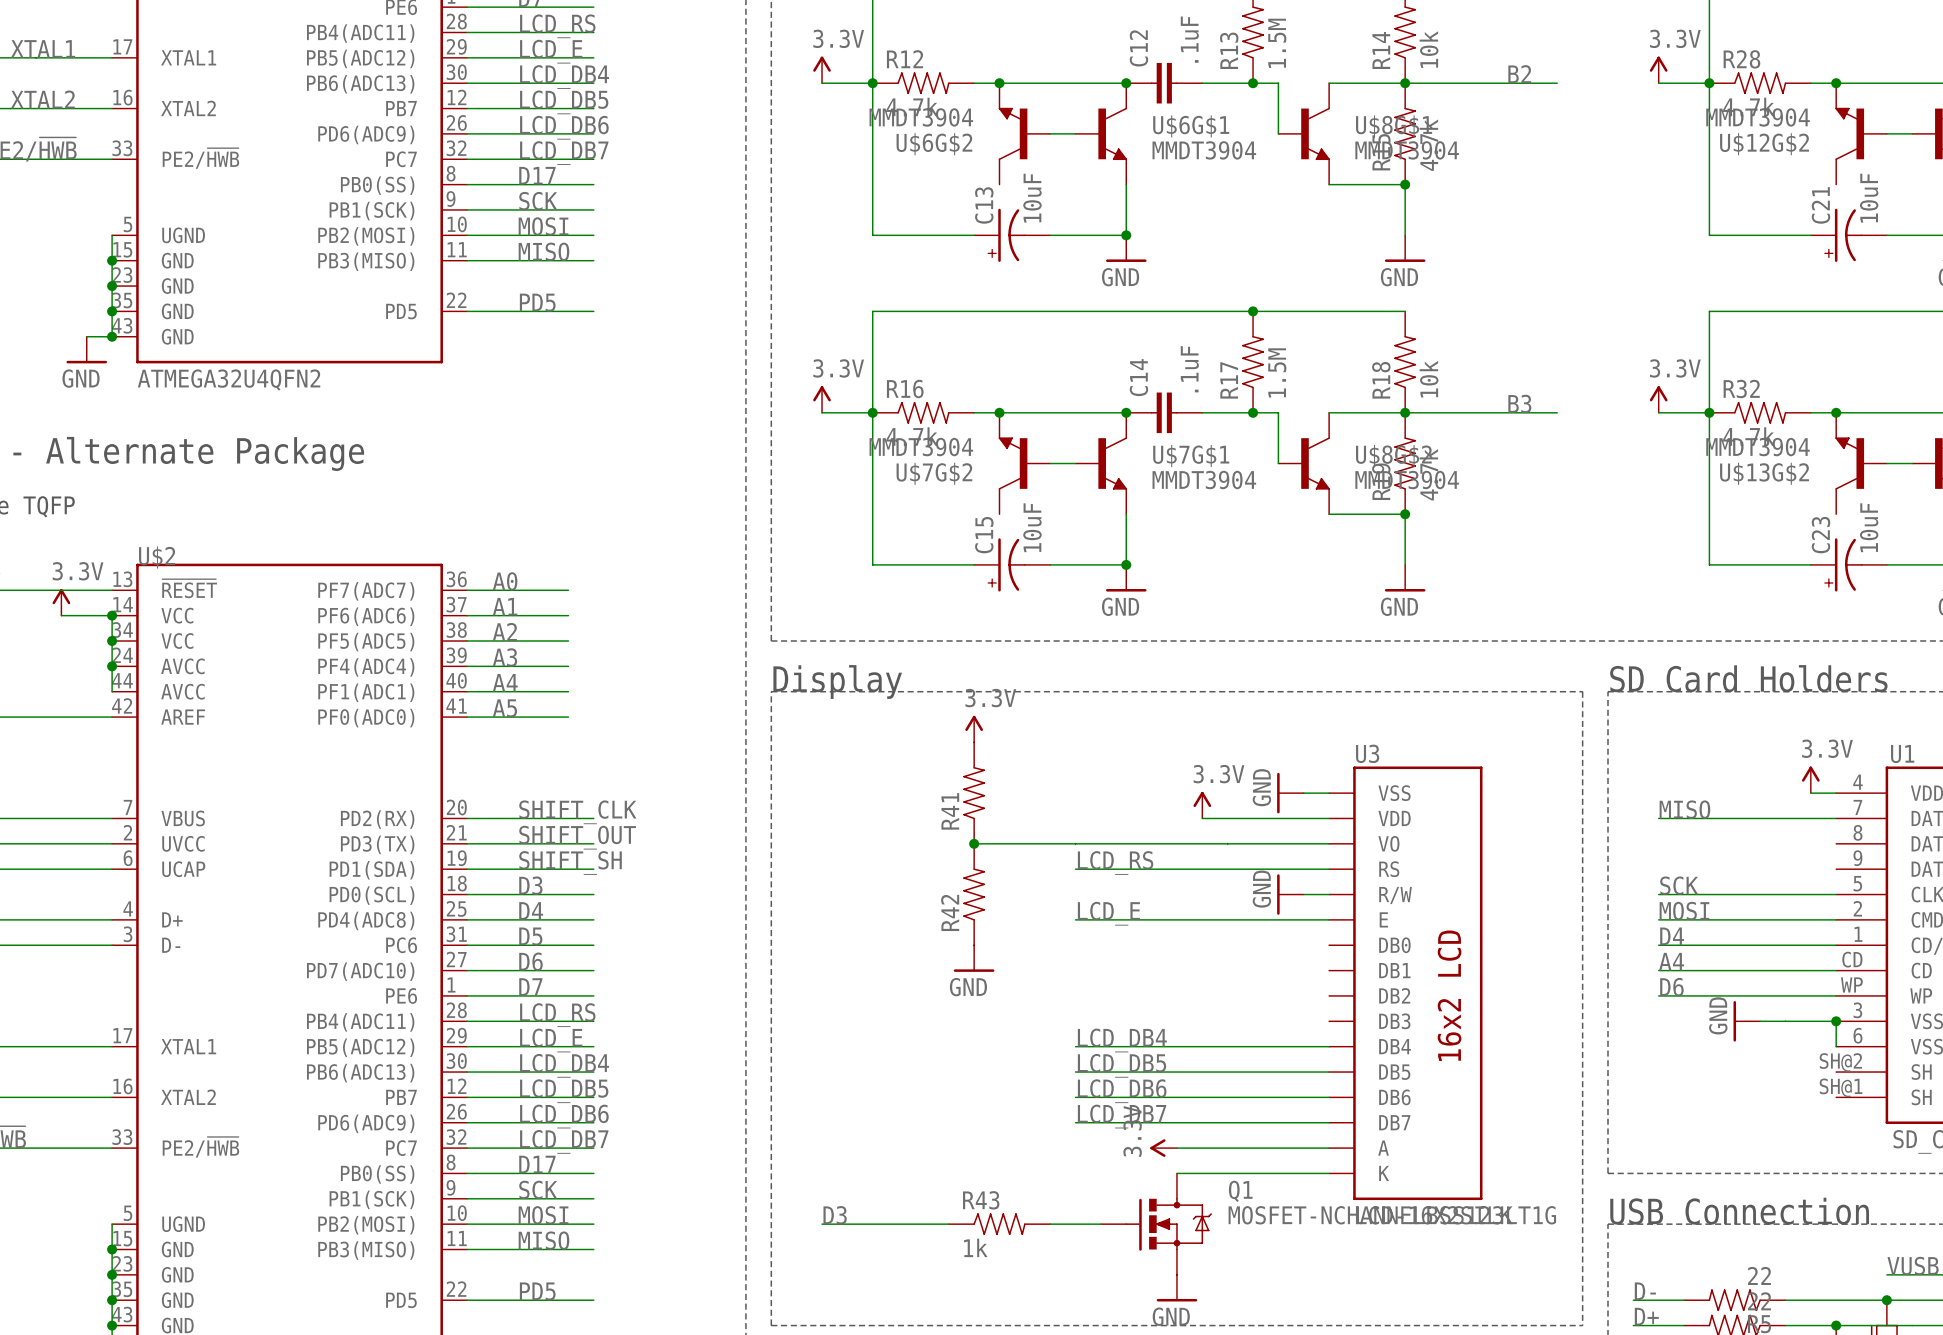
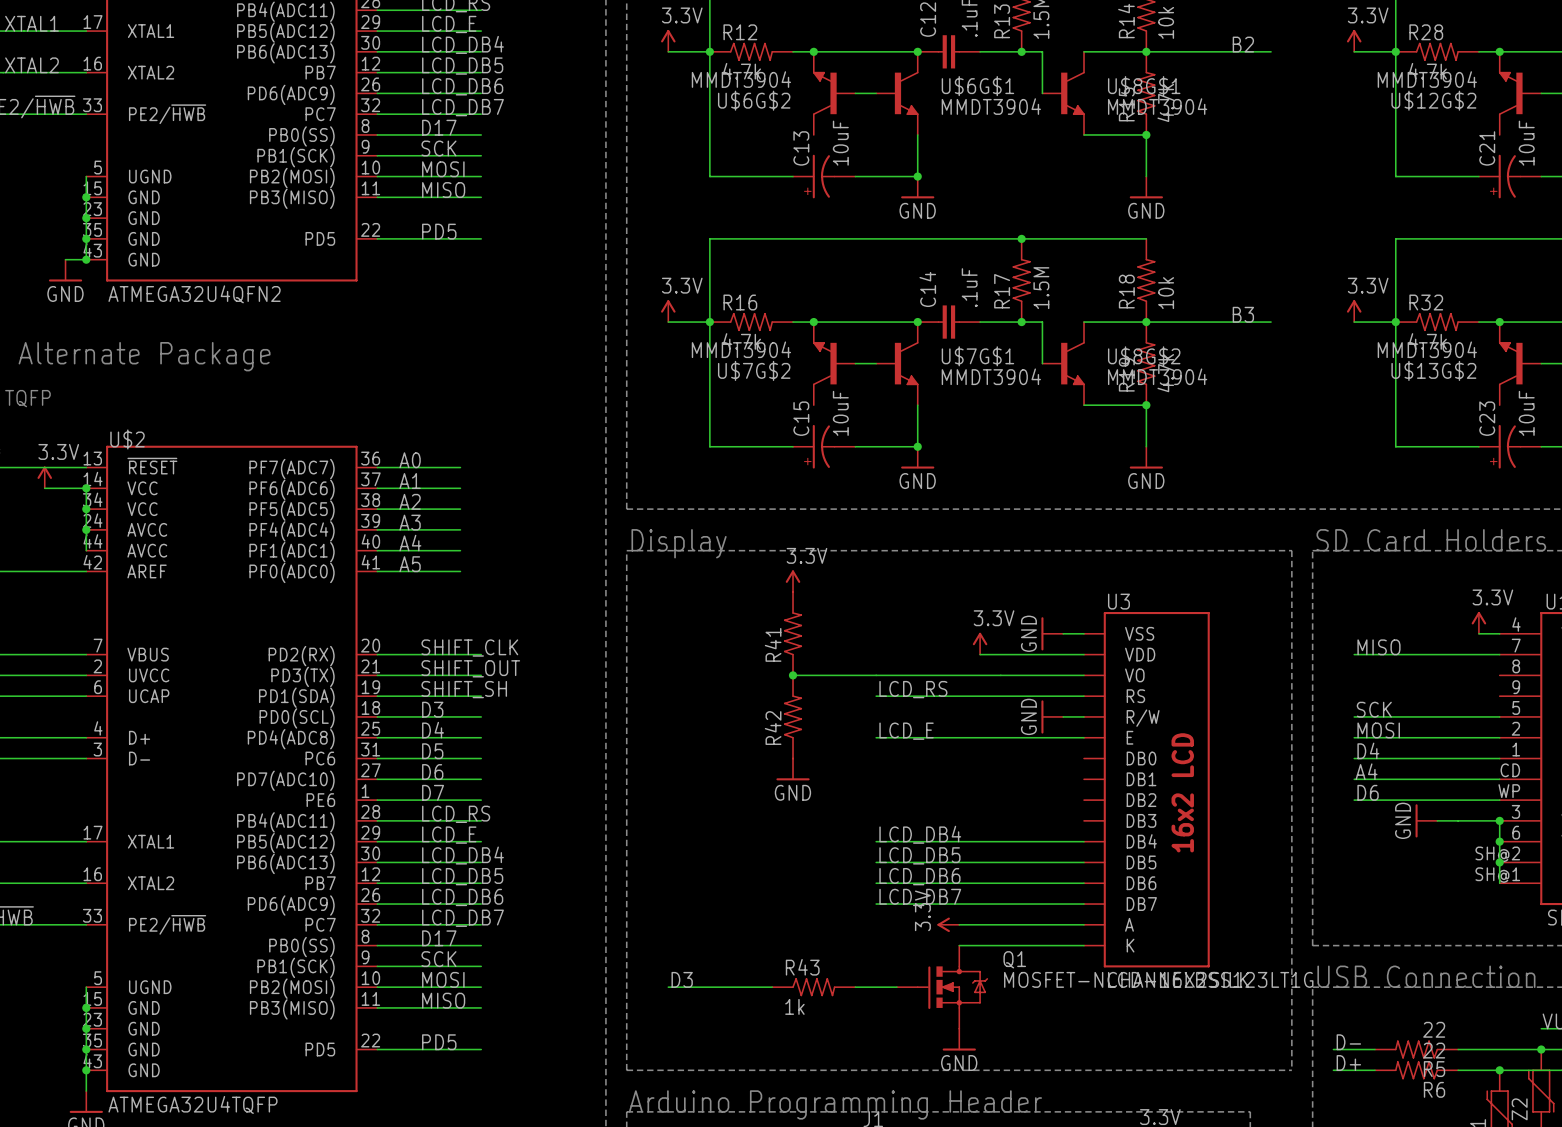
wire: none -> (1499, 841) (1499, 883)
junction: none -> (1499, 841)
junction: none -> (1499, 862)

